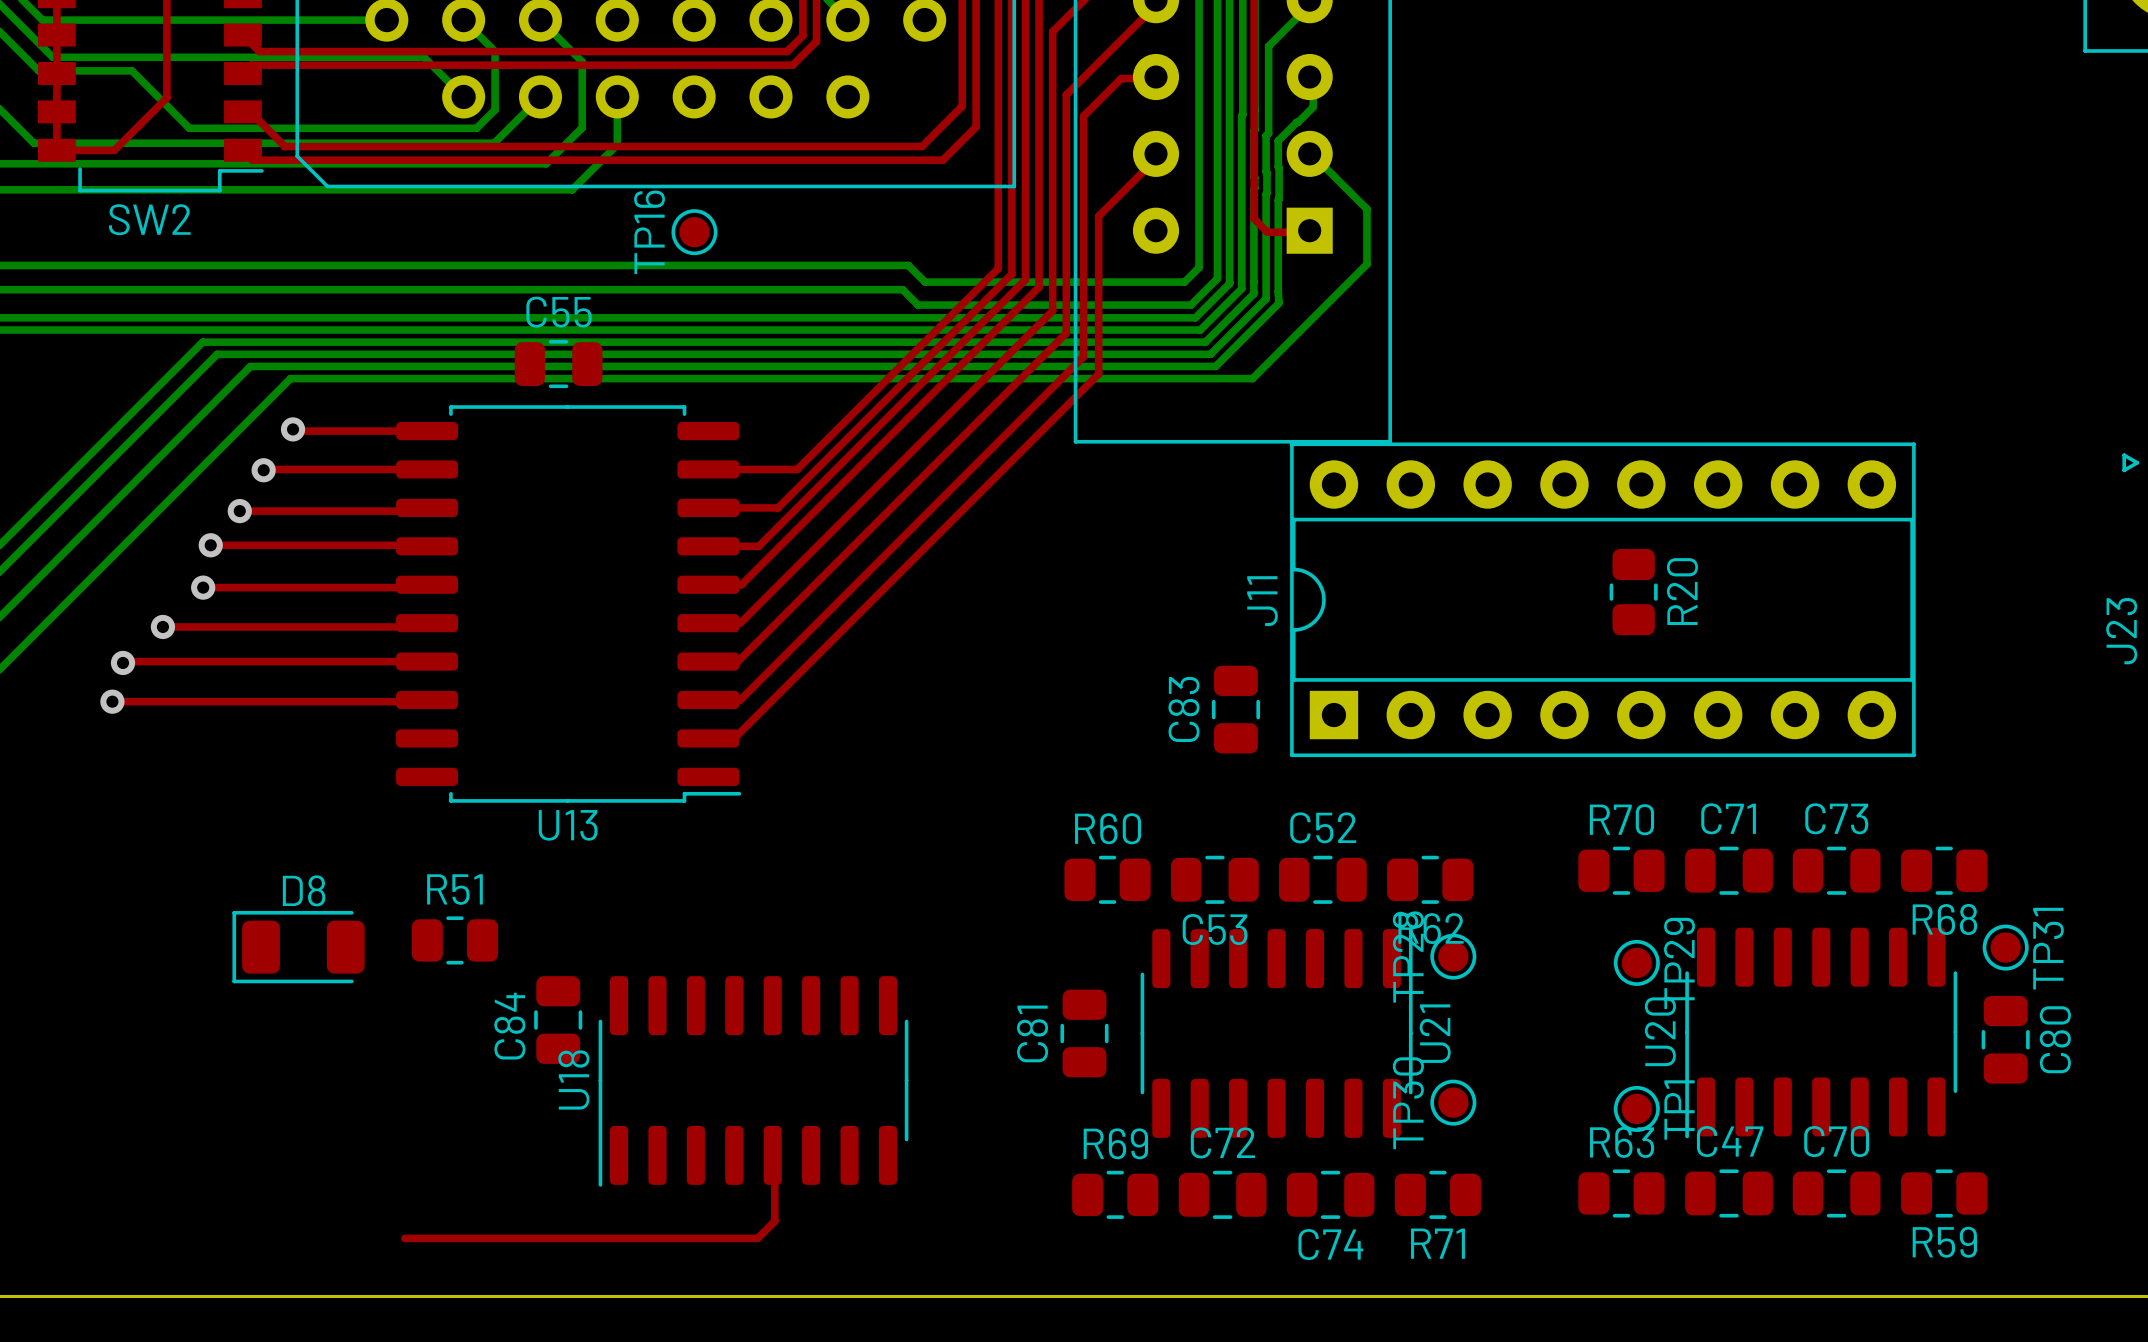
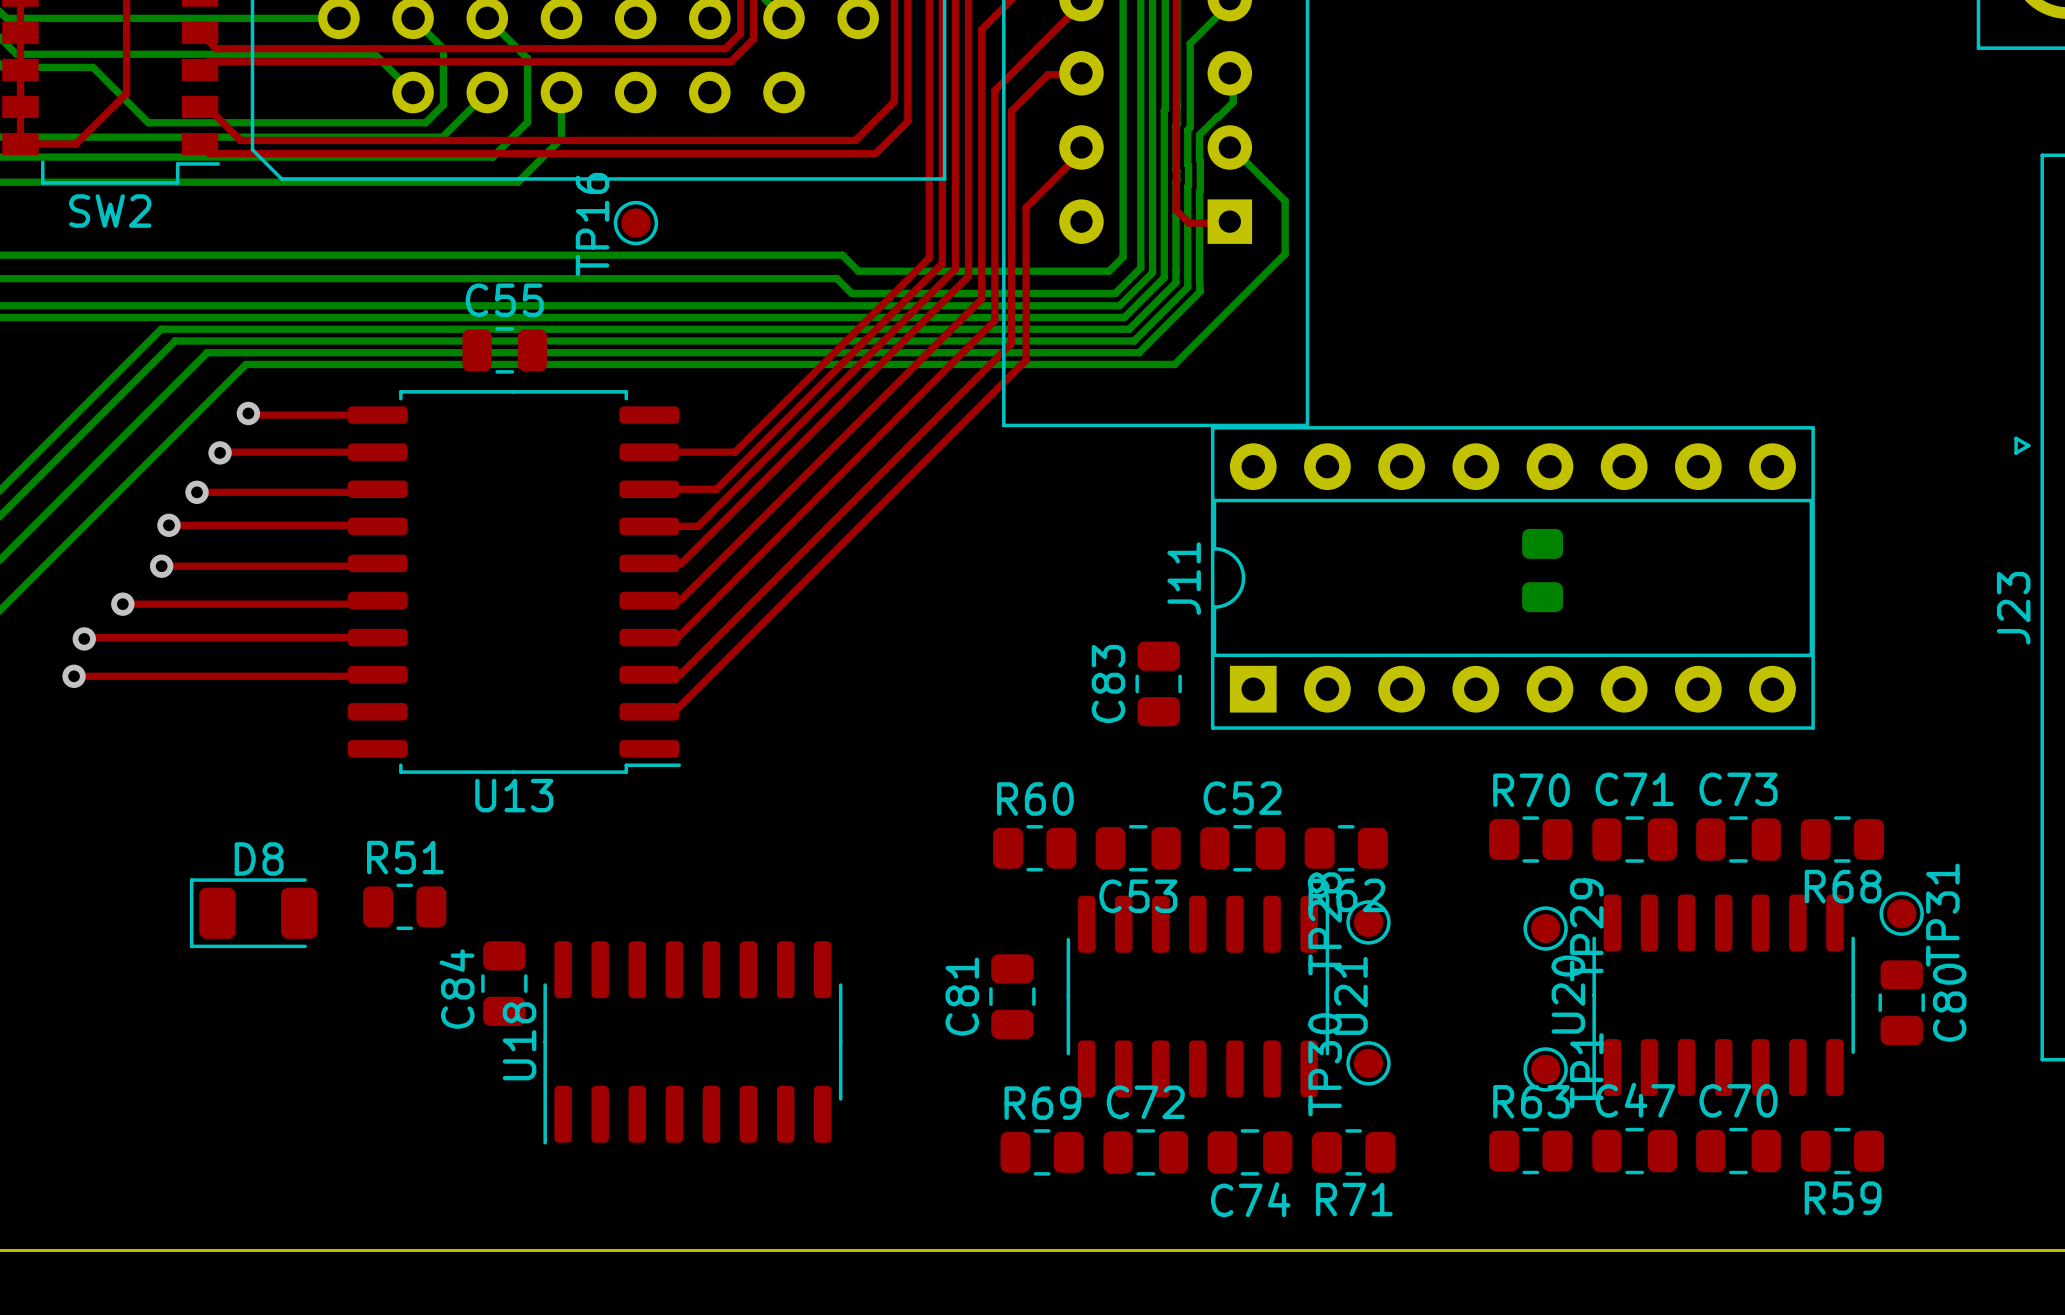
R20 side: top (1633, 592) -> bottom (1542, 570)
top track: (774, 1157) (774, 1221) (757, 1238) (404, 1238) -> none

